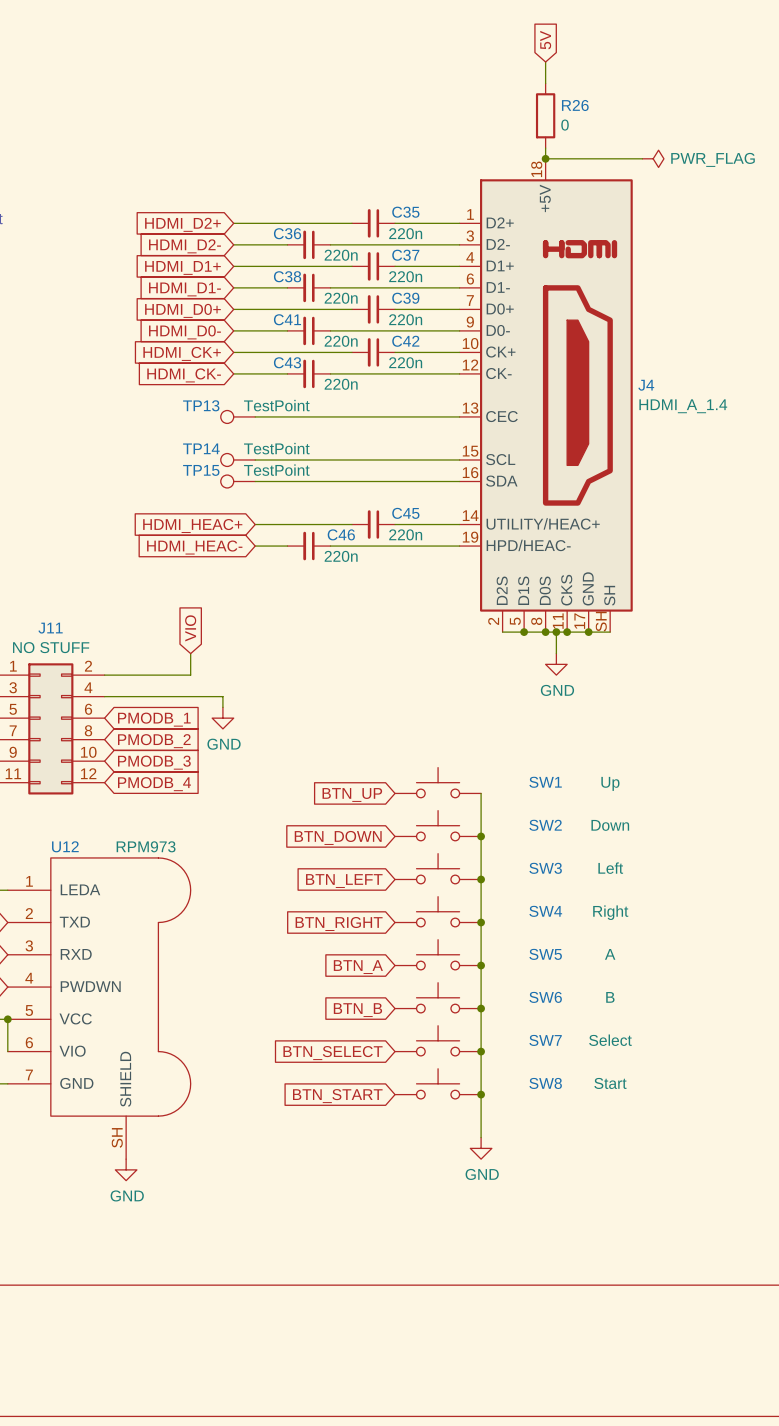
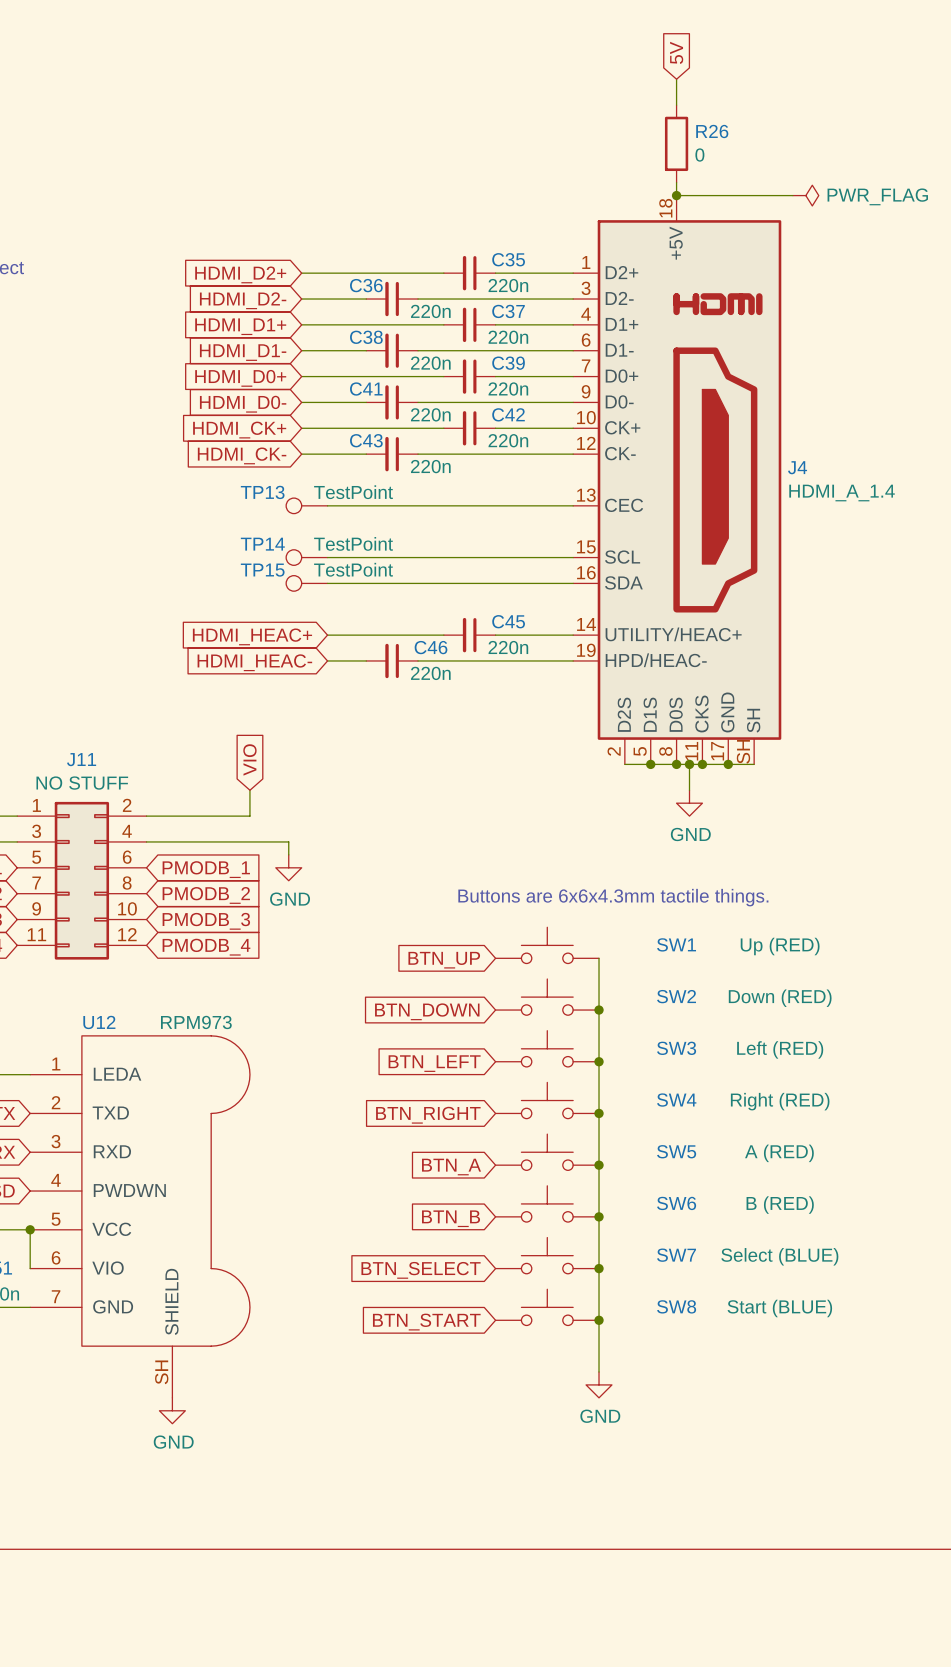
text: none -> Buttons are 6x6x4.3mm tactile things. (613, 897)
SW1 value: Up (610, 783) -> Up (RED) (780, 946)
SW2 value: Down (610, 825) -> Down (RED) (780, 998)
SW3 value: Left (610, 868) -> Left (RED) (780, 1049)
SW4 value: Right (610, 912) -> Right (RED) (780, 1101)
SW5 value: A (610, 954) -> A (RED) (779, 1153)
SW6 value: B (610, 997) -> B (RED) (780, 1205)
SW7 value: Select (610, 1040) -> Select (BLUE) (779, 1256)
SW8 value: Start (610, 1083) -> Start (BLUE) (779, 1308)

